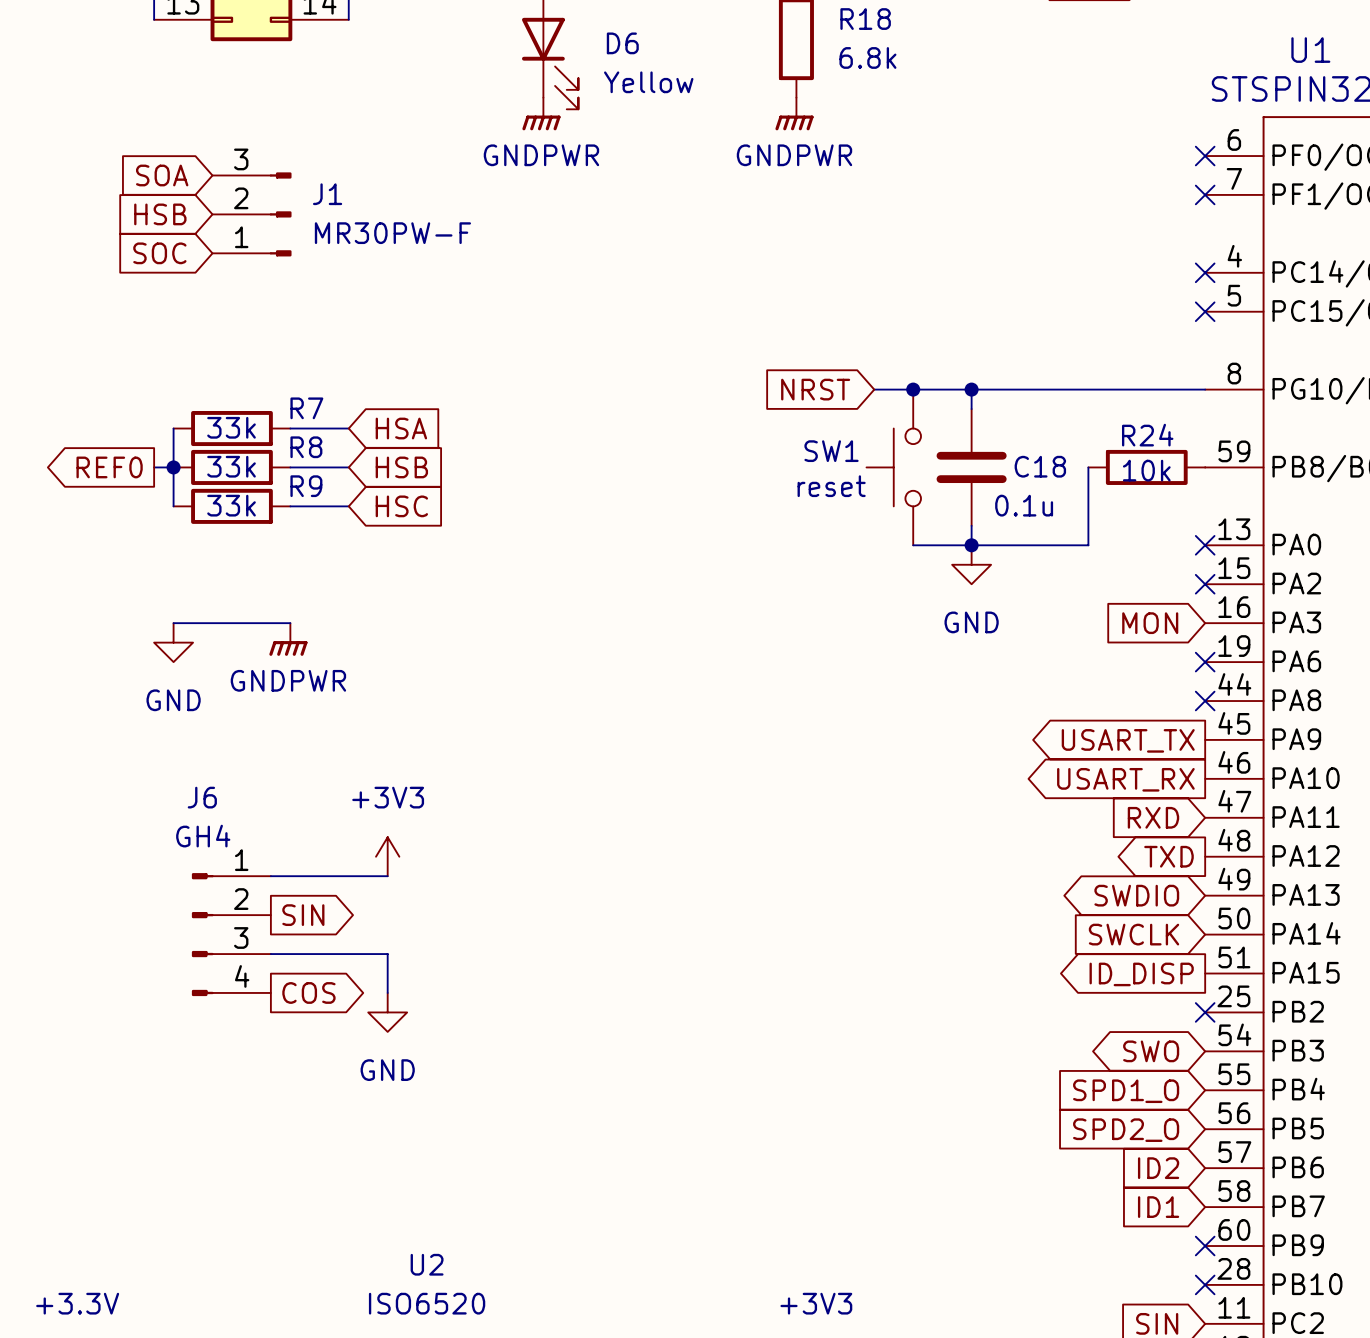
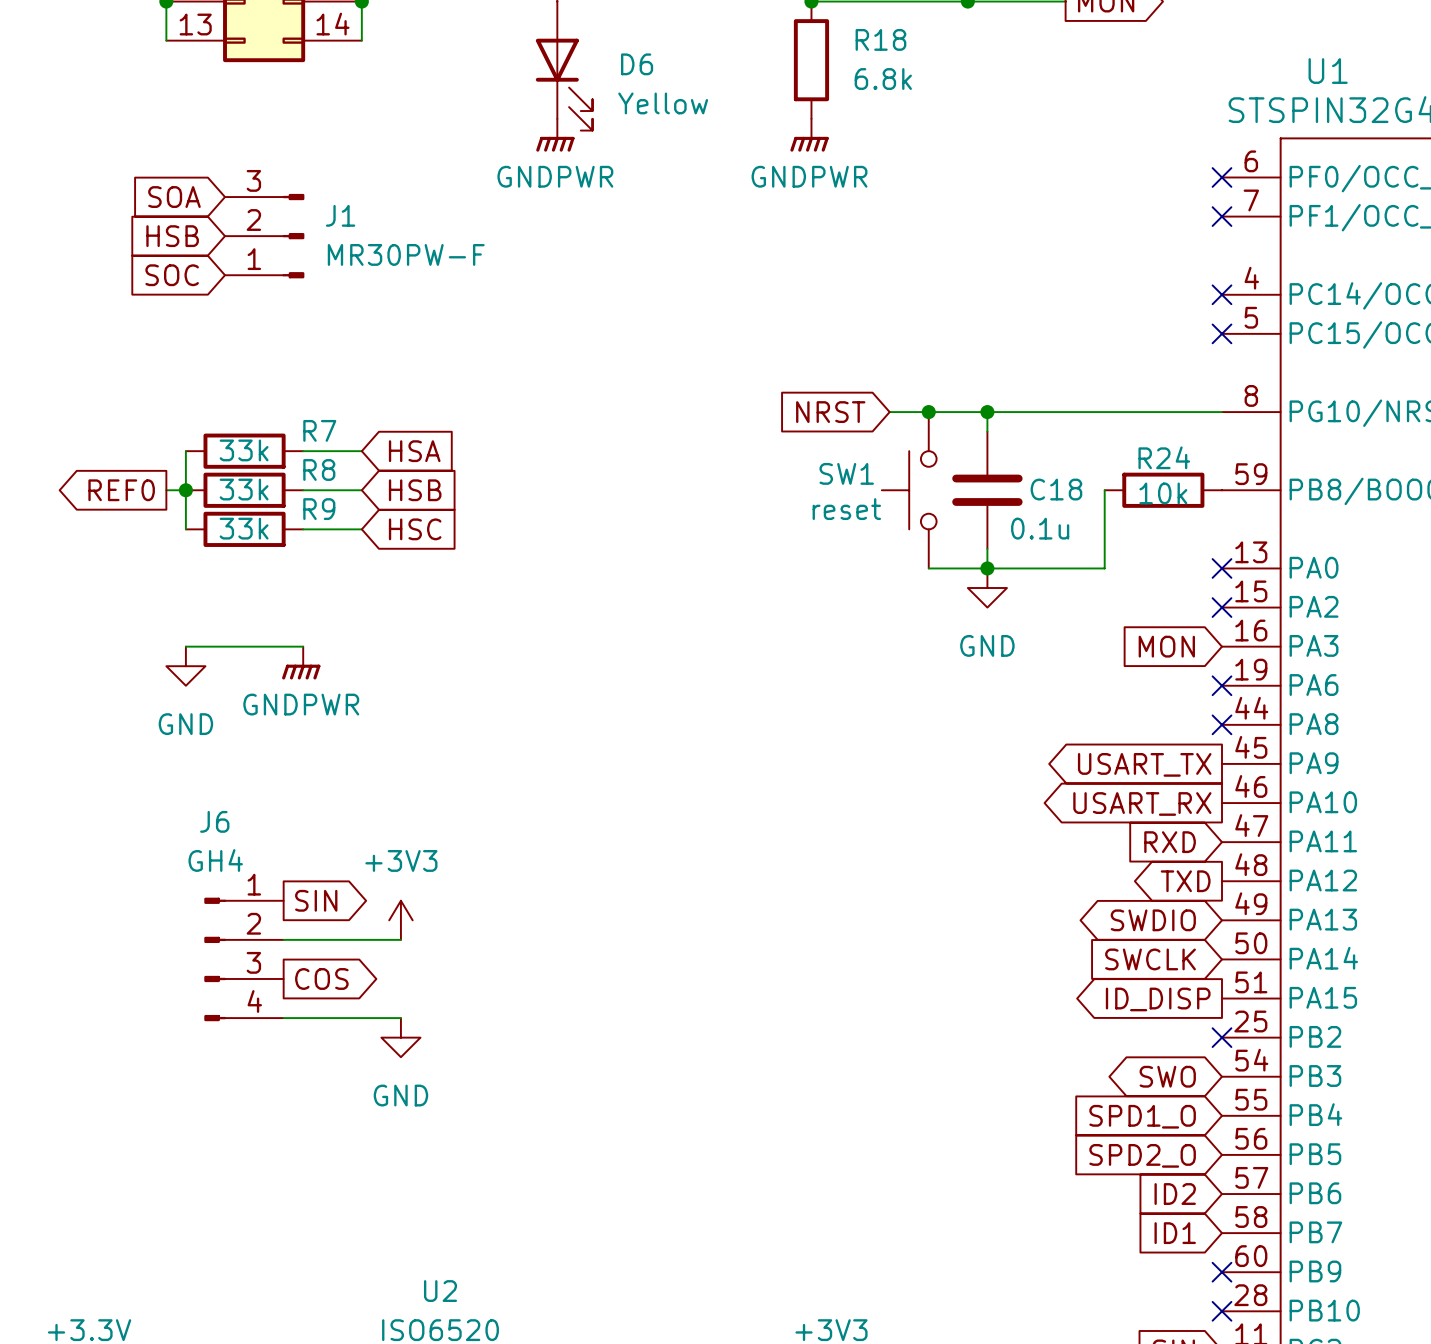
power symbol position: +3V3 (387, 856) -> +3V3 (400, 920)
wire: (270, 876) (387, 876) -> (283, 939) (400, 939)
global label position: SIN (303, 915) -> SIN (316, 900)
wire: (270, 954) (387, 954) (387, 992) -> (283, 1018) (400, 1018)
global label position: COS (308, 992) -> COS (321, 978)

